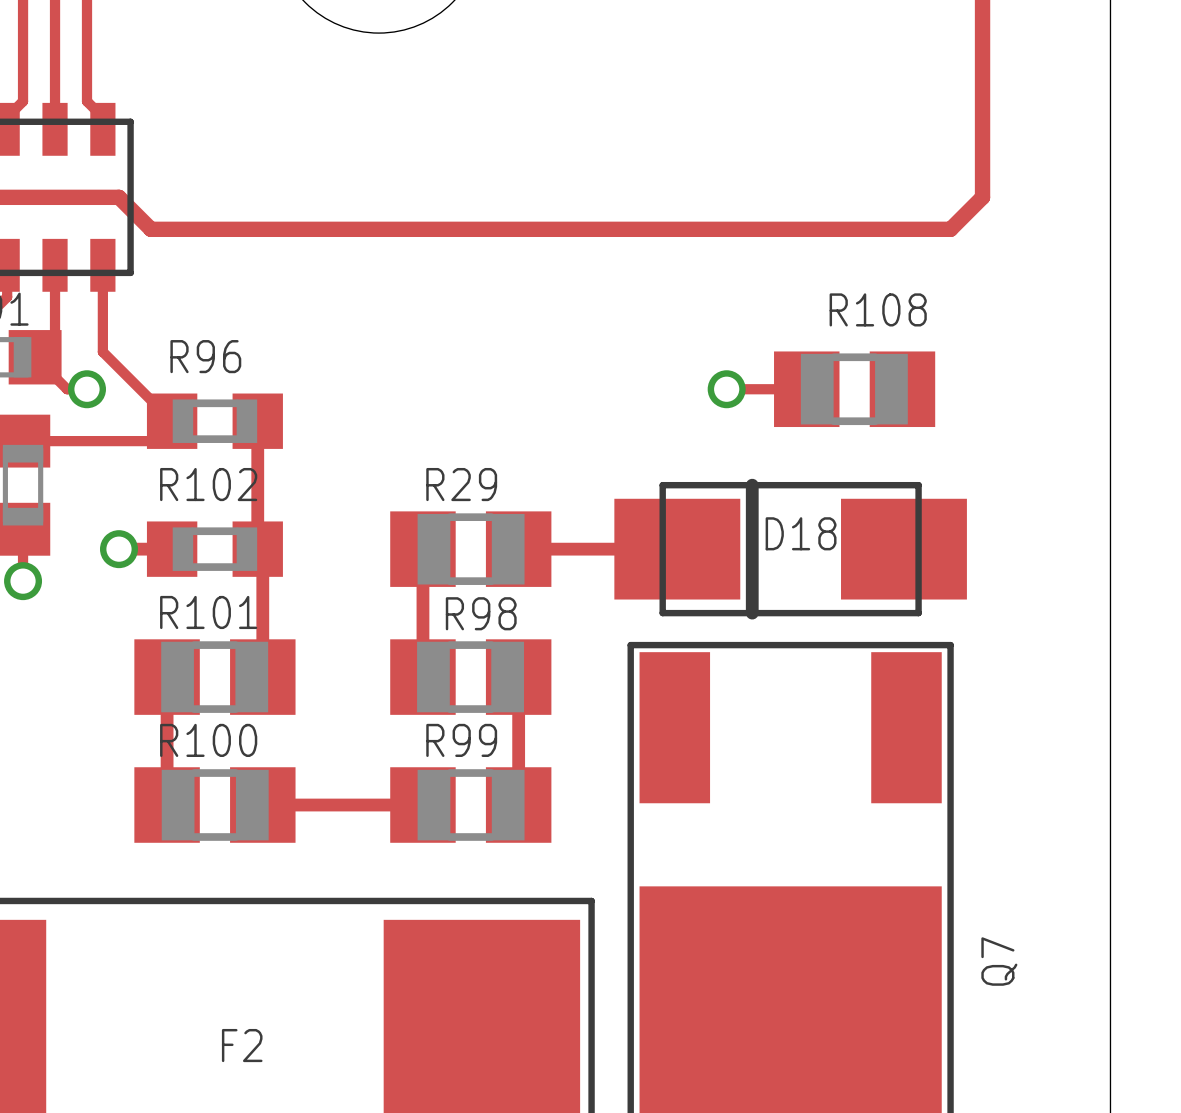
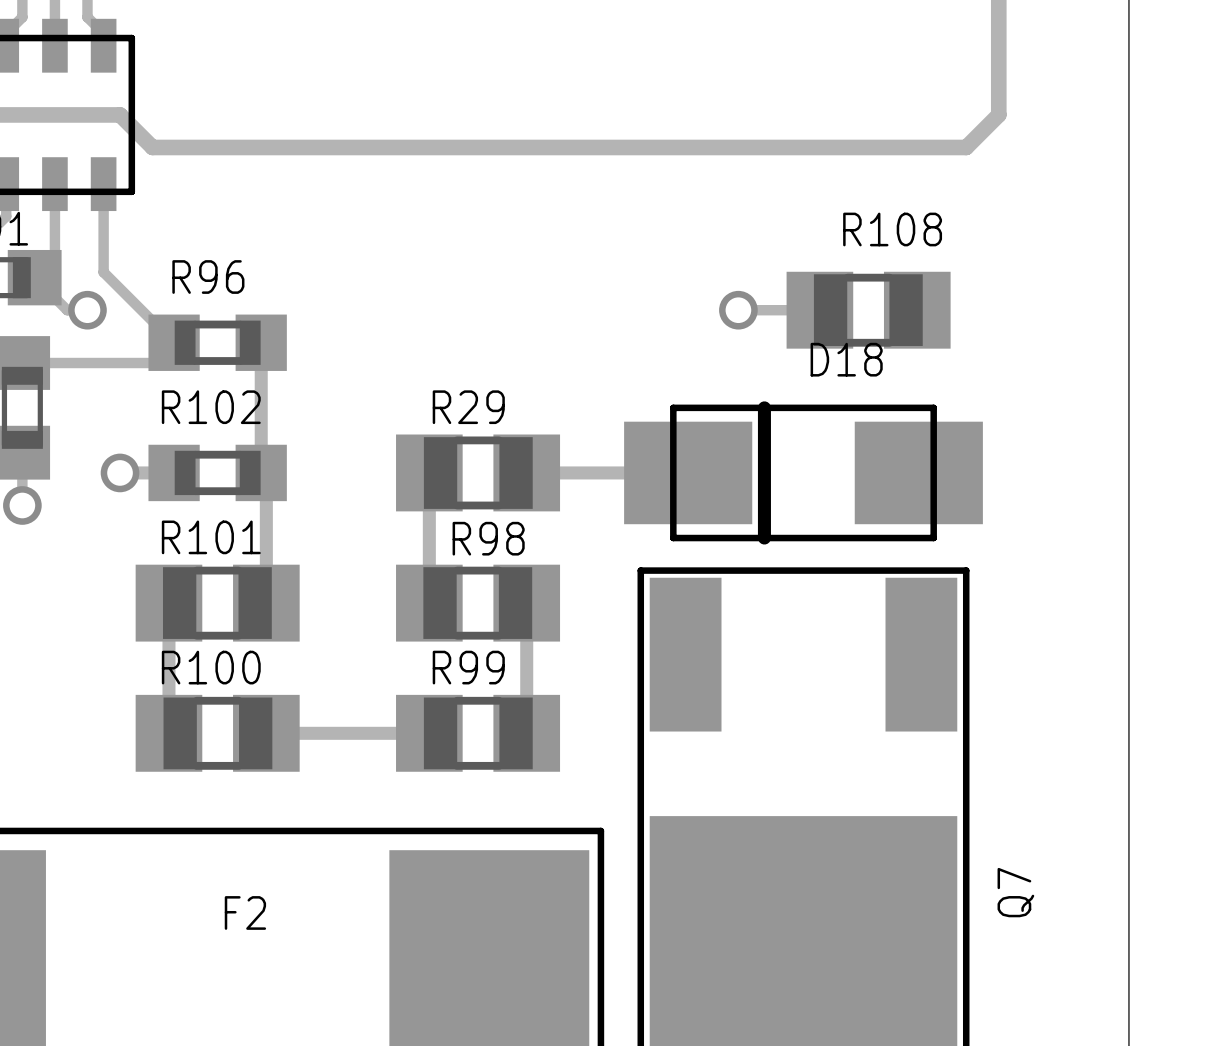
D18 name position: D18 (801, 533) -> D18 (846, 359)
F2 name position: F2 (242, 1045) -> F2 (245, 912)

